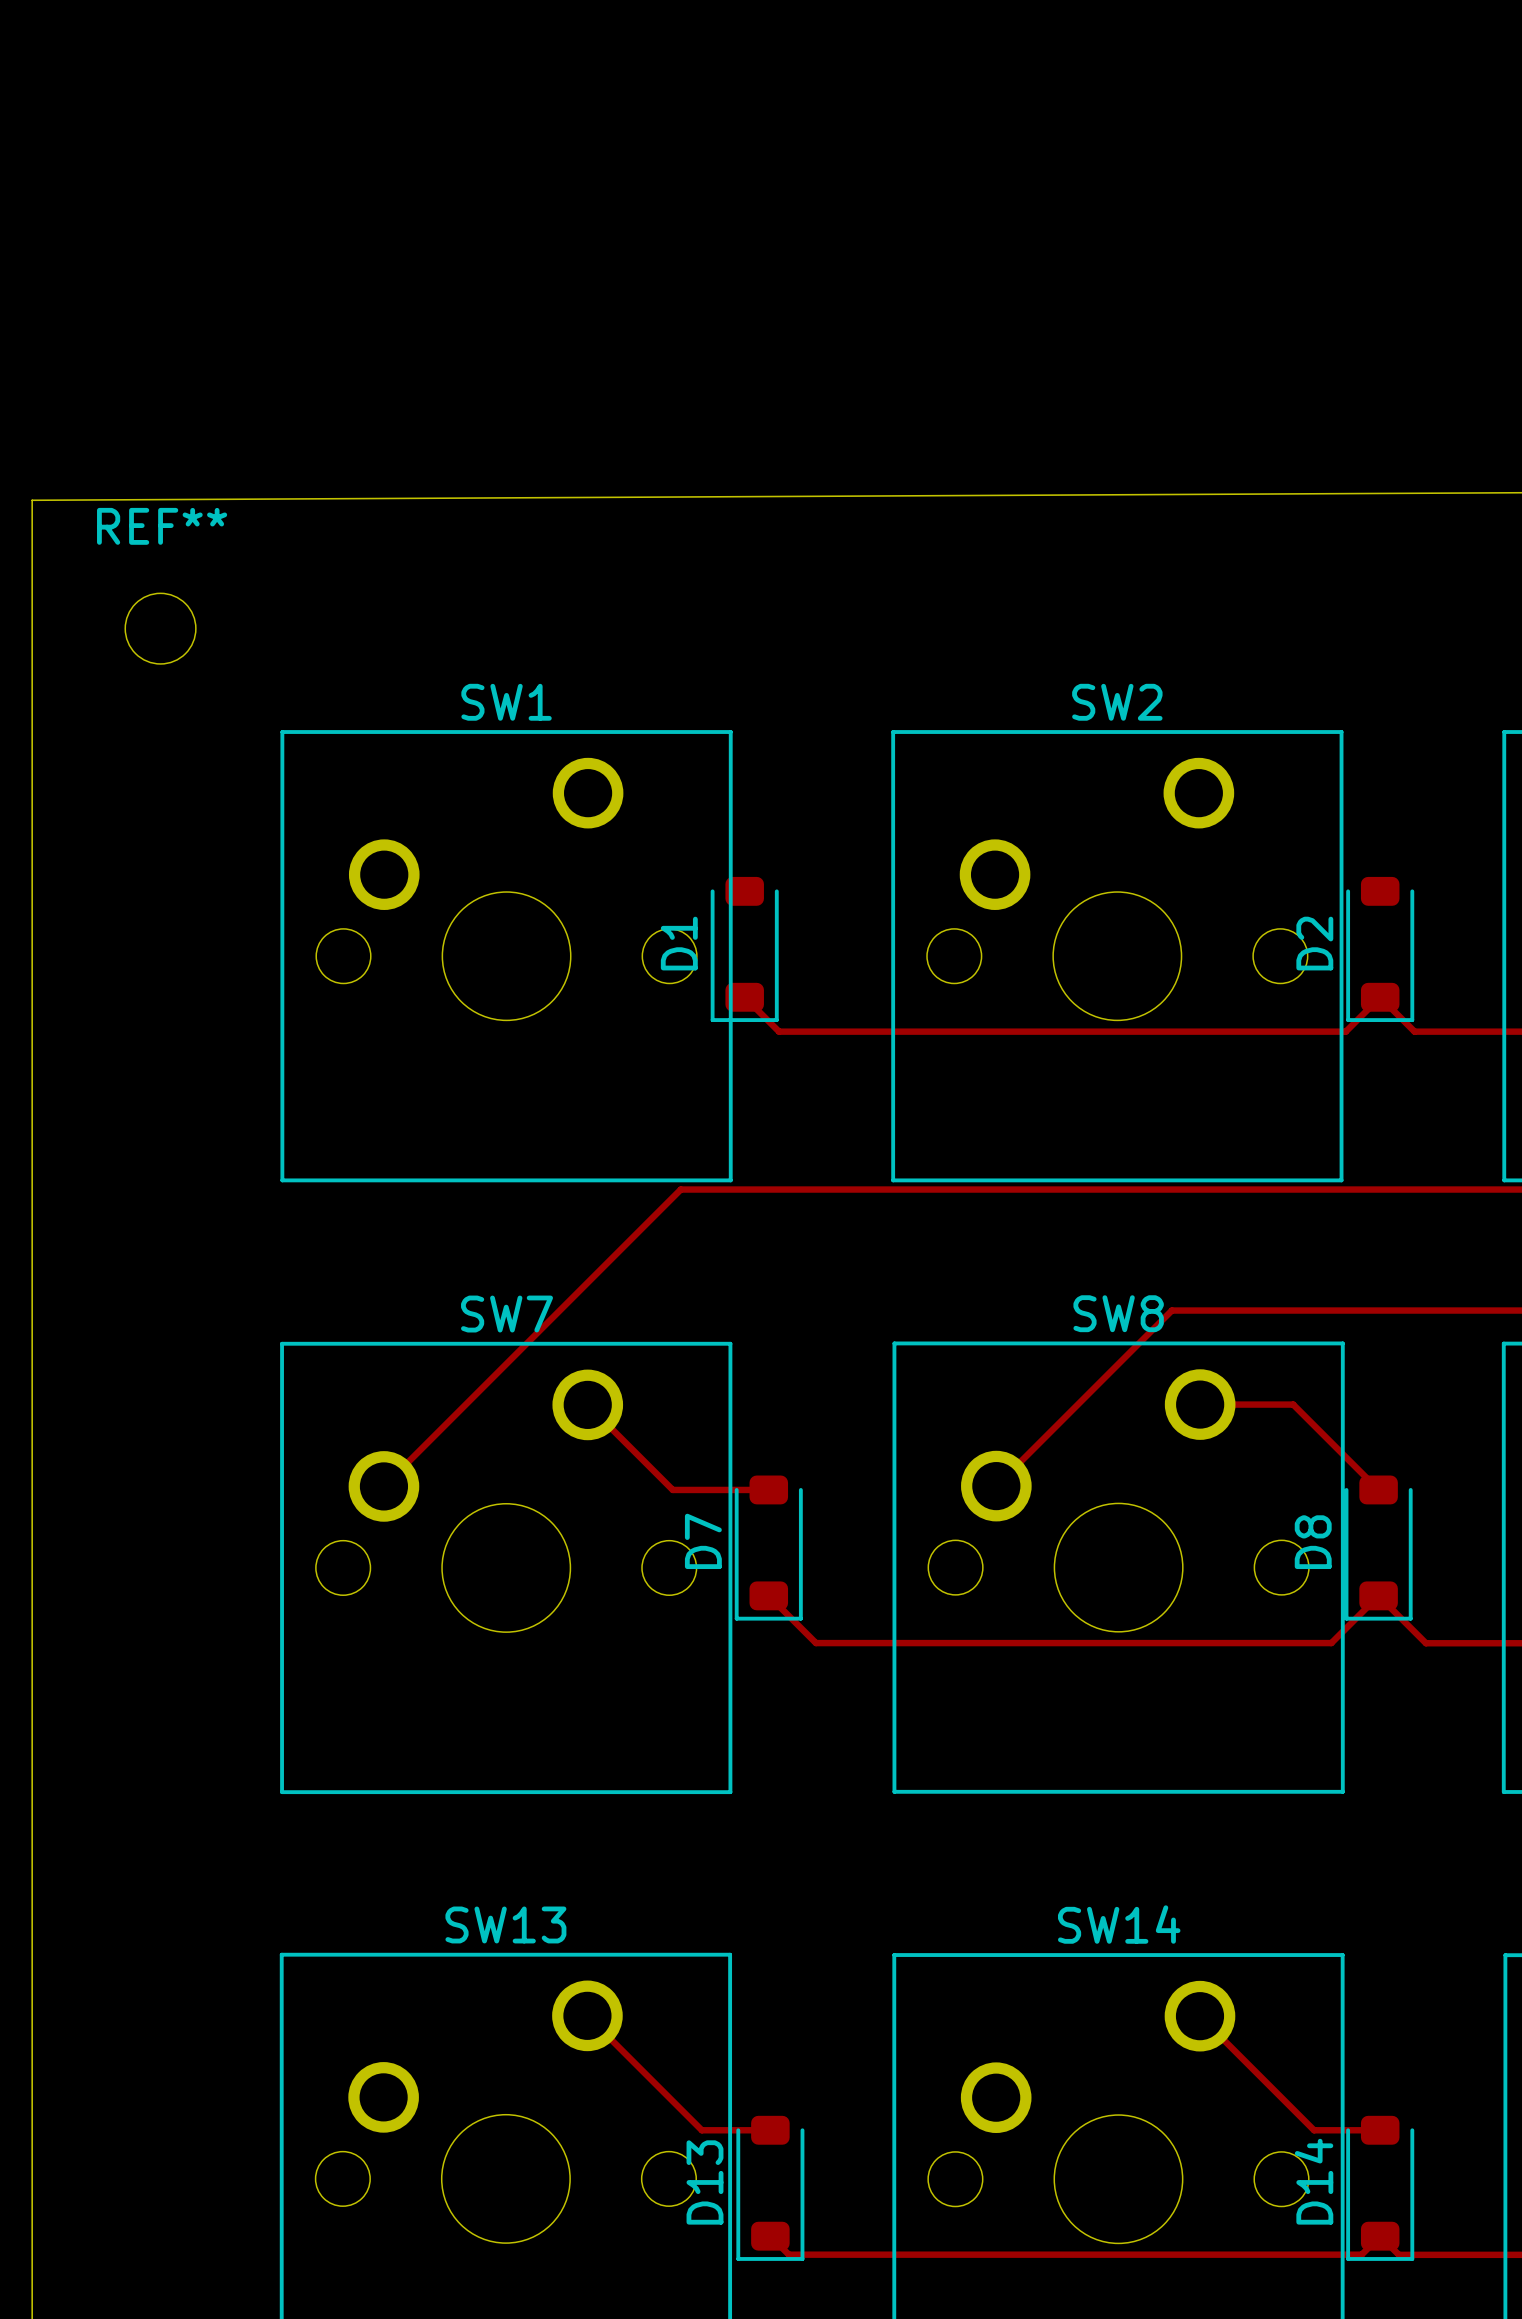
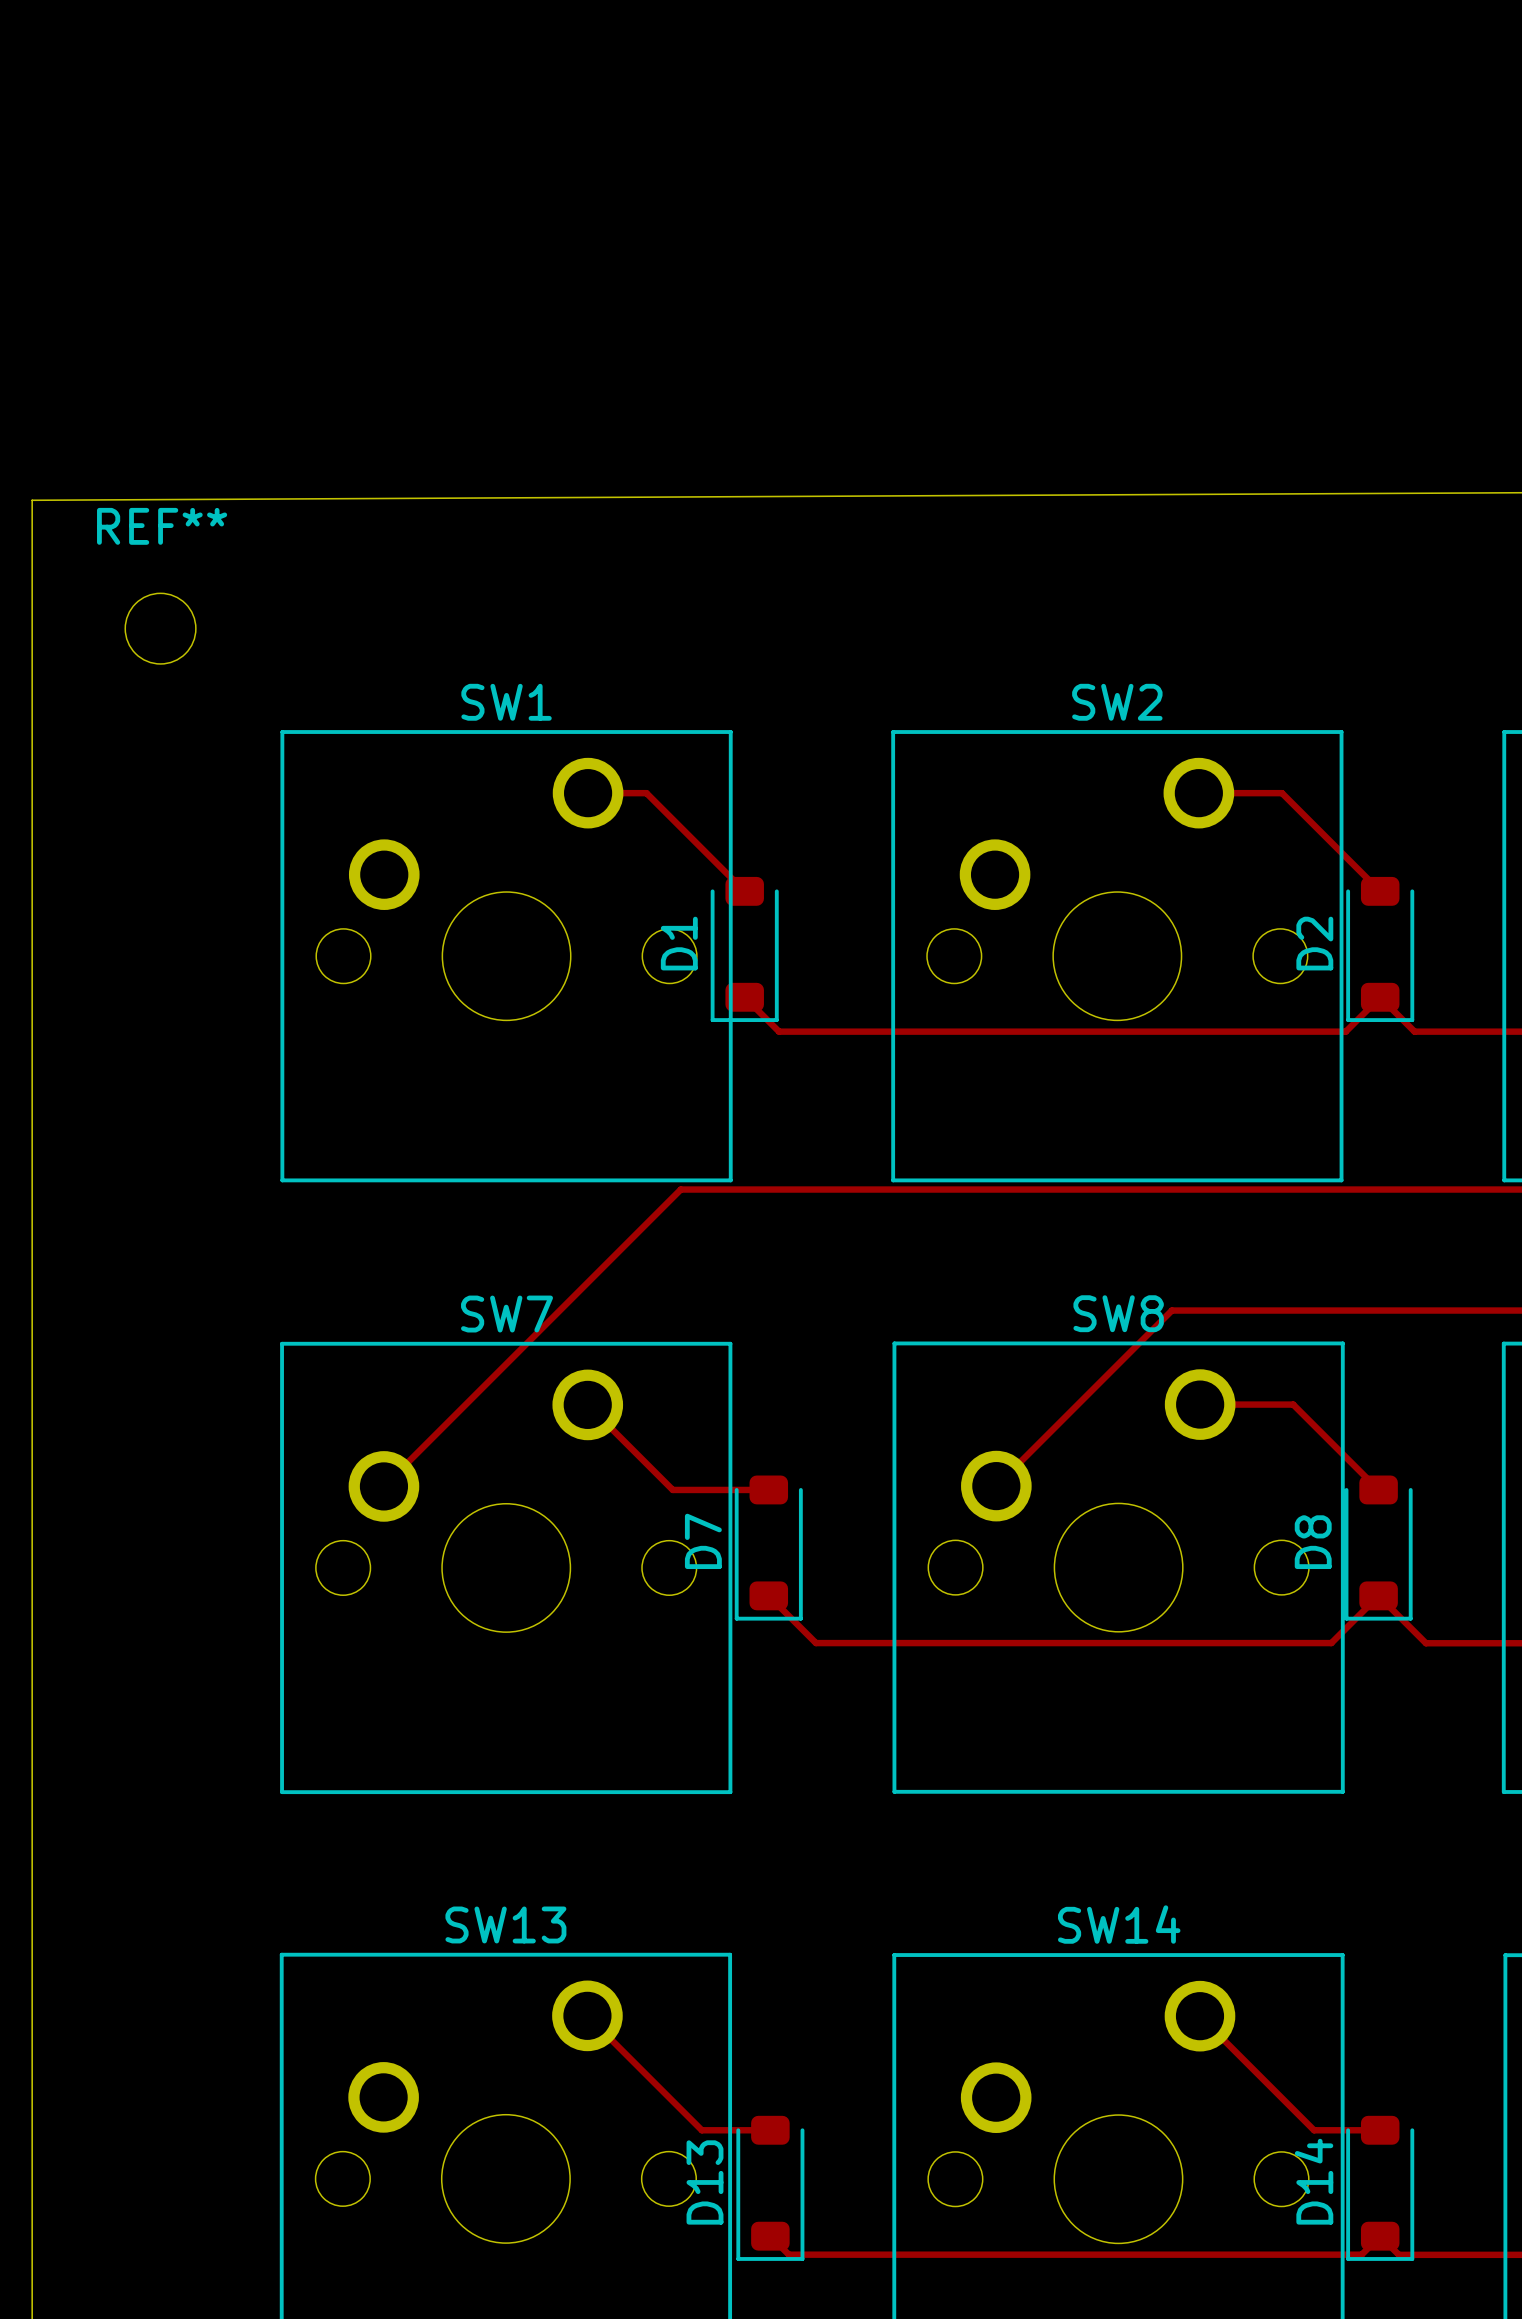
track: none -> (588, 793) (646, 793) (744, 891)
track: none -> (1198, 793) (1281, 793) (1380, 891)

